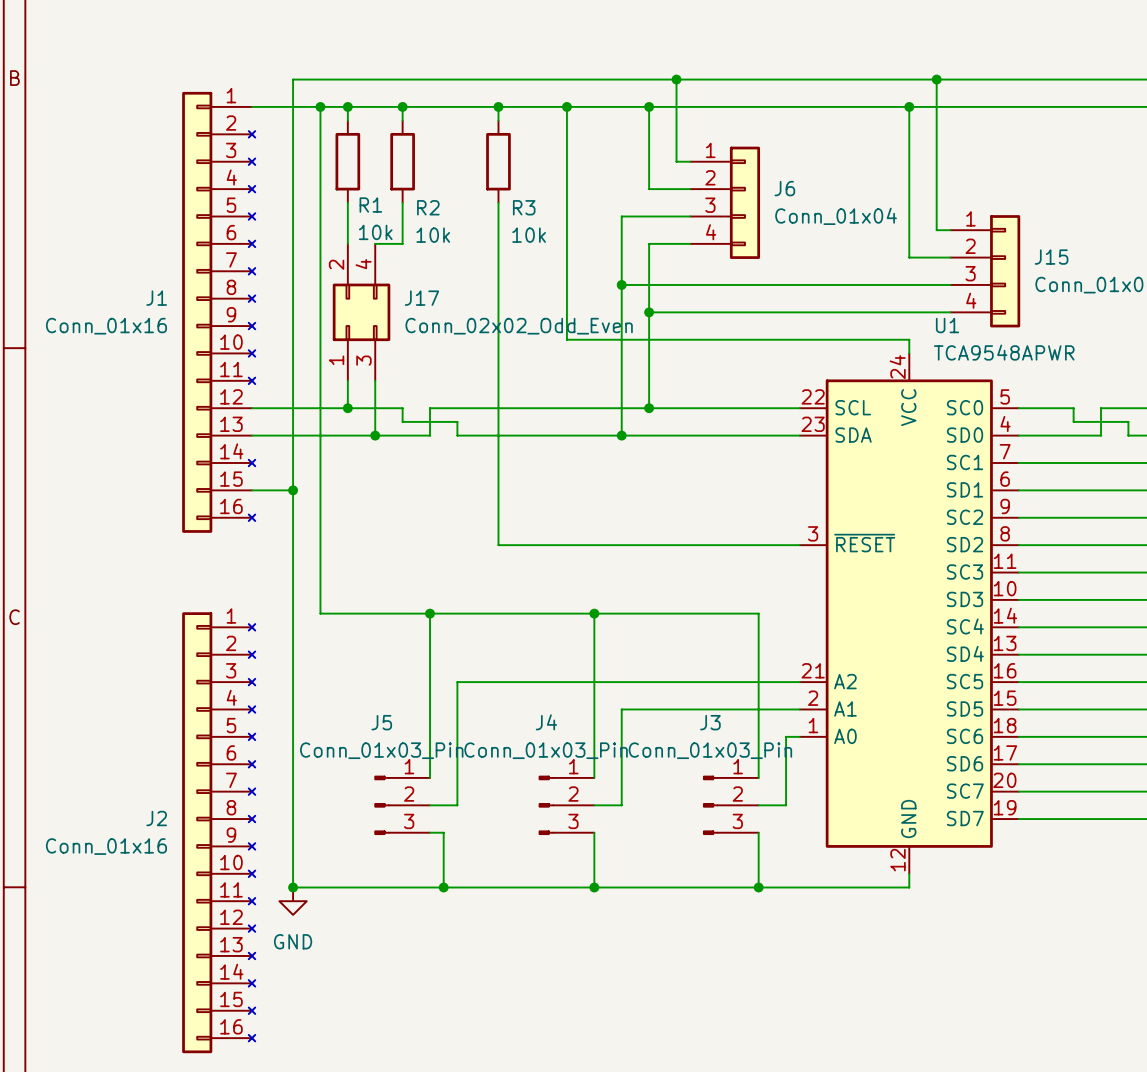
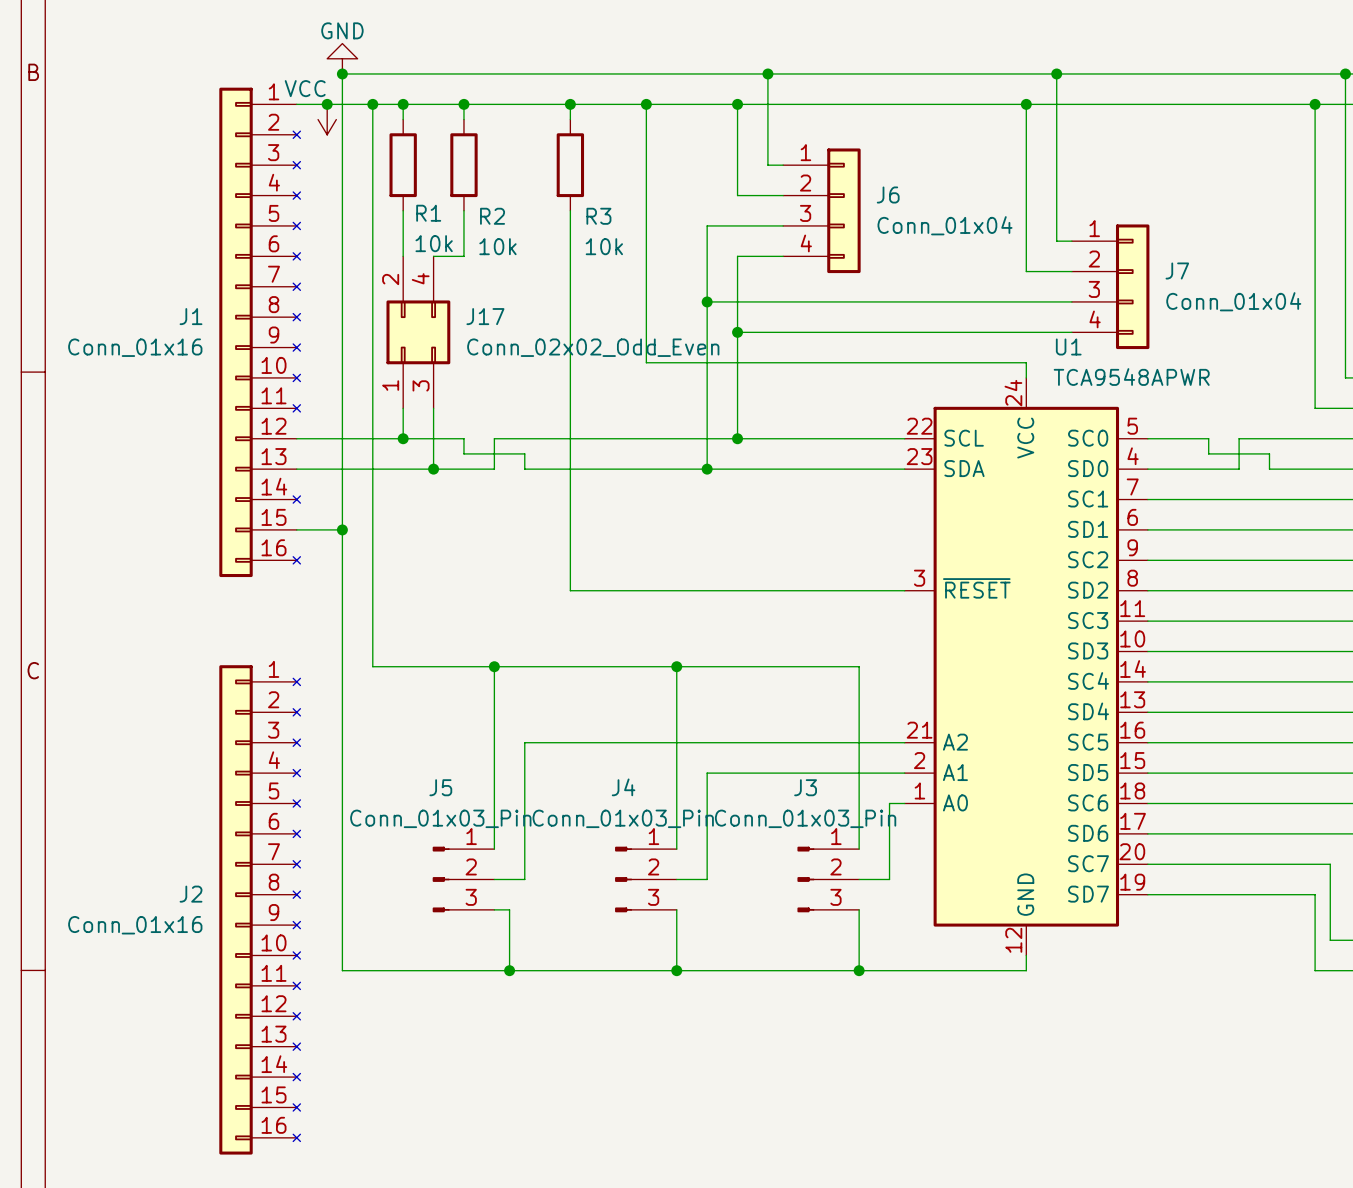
power symbol: none -> GND (342, 58)
junction: none -> (342, 73)
junction: none -> (327, 104)
power symbol: none -> VCC (327, 119)
J15 name: J15 (1051, 257) -> J7 (1177, 270)
junction: (293, 887) -> none
power symbol: GND (293, 901) -> none

